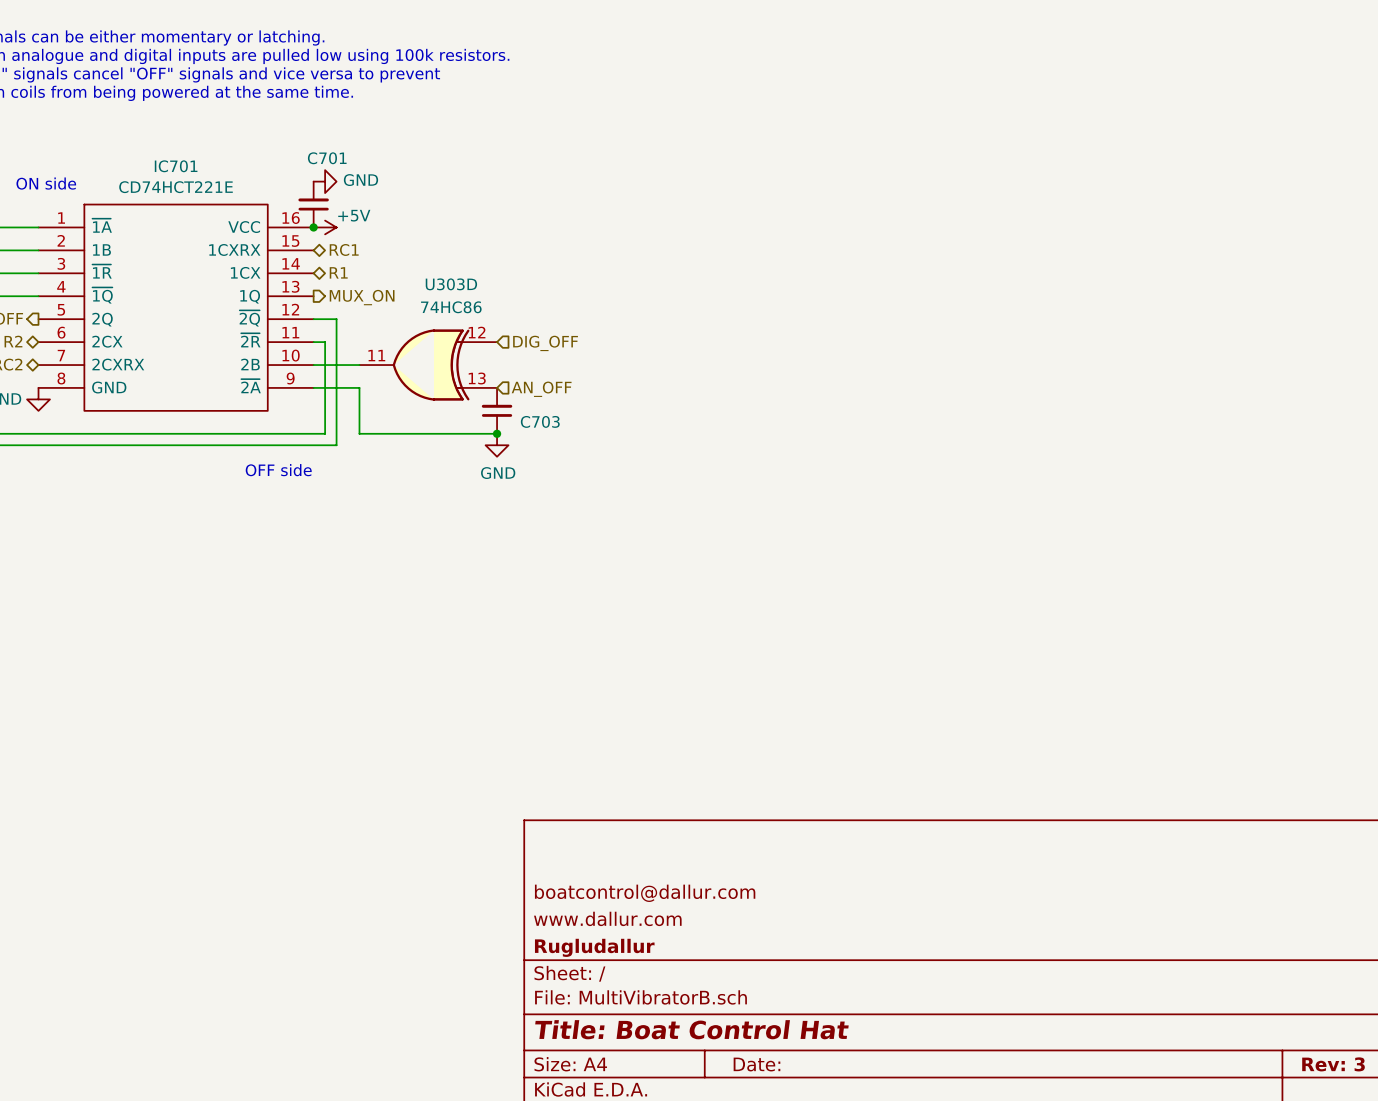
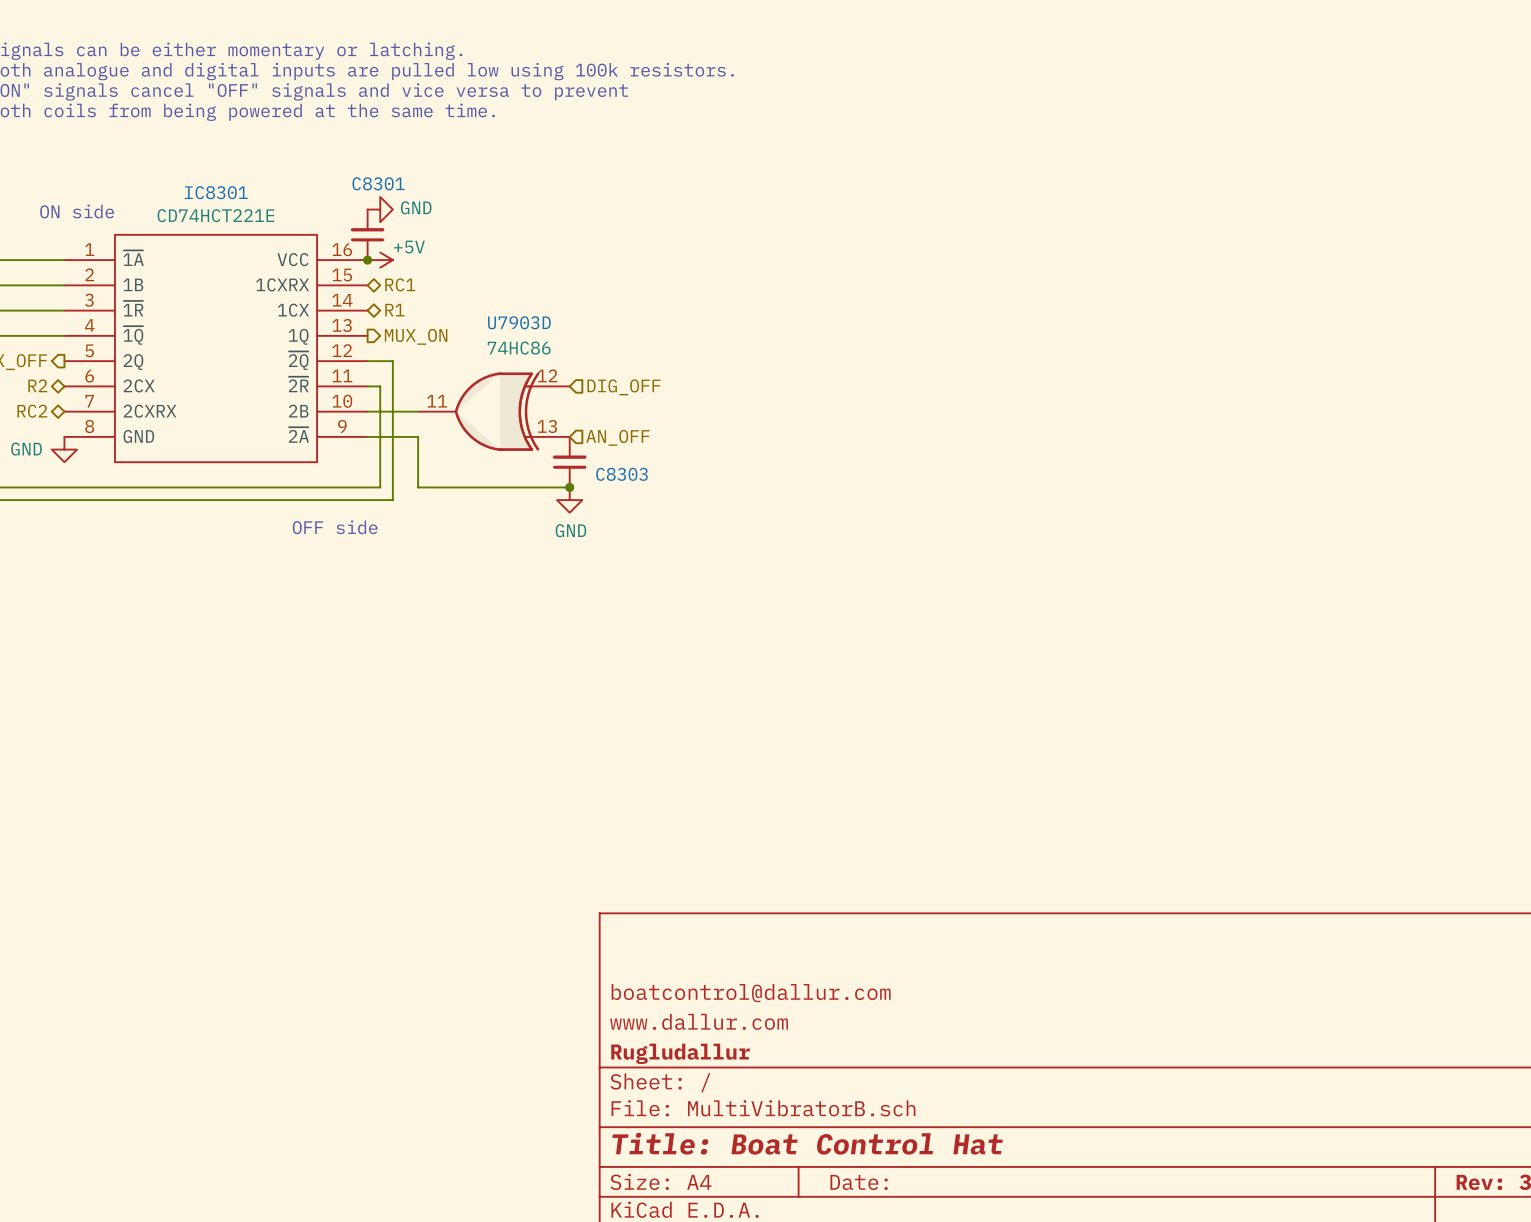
C701 name: C701 (327, 158) -> C8301 (378, 183)
IC701 name: IC701 (176, 166) -> IC8301 (216, 192)
U303D name: U303D (451, 284) -> U7903D (519, 322)
C703 name: C703 (540, 421) -> C8303 (622, 474)

